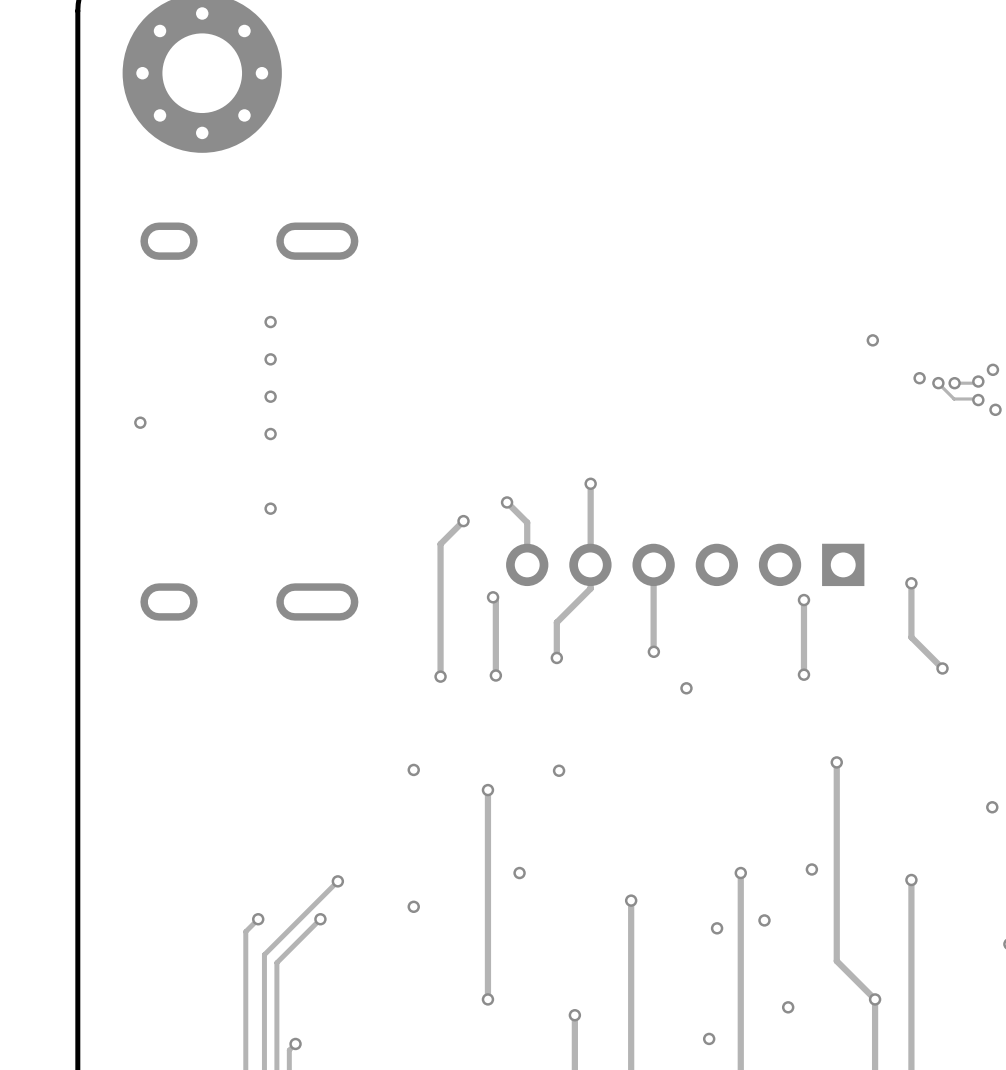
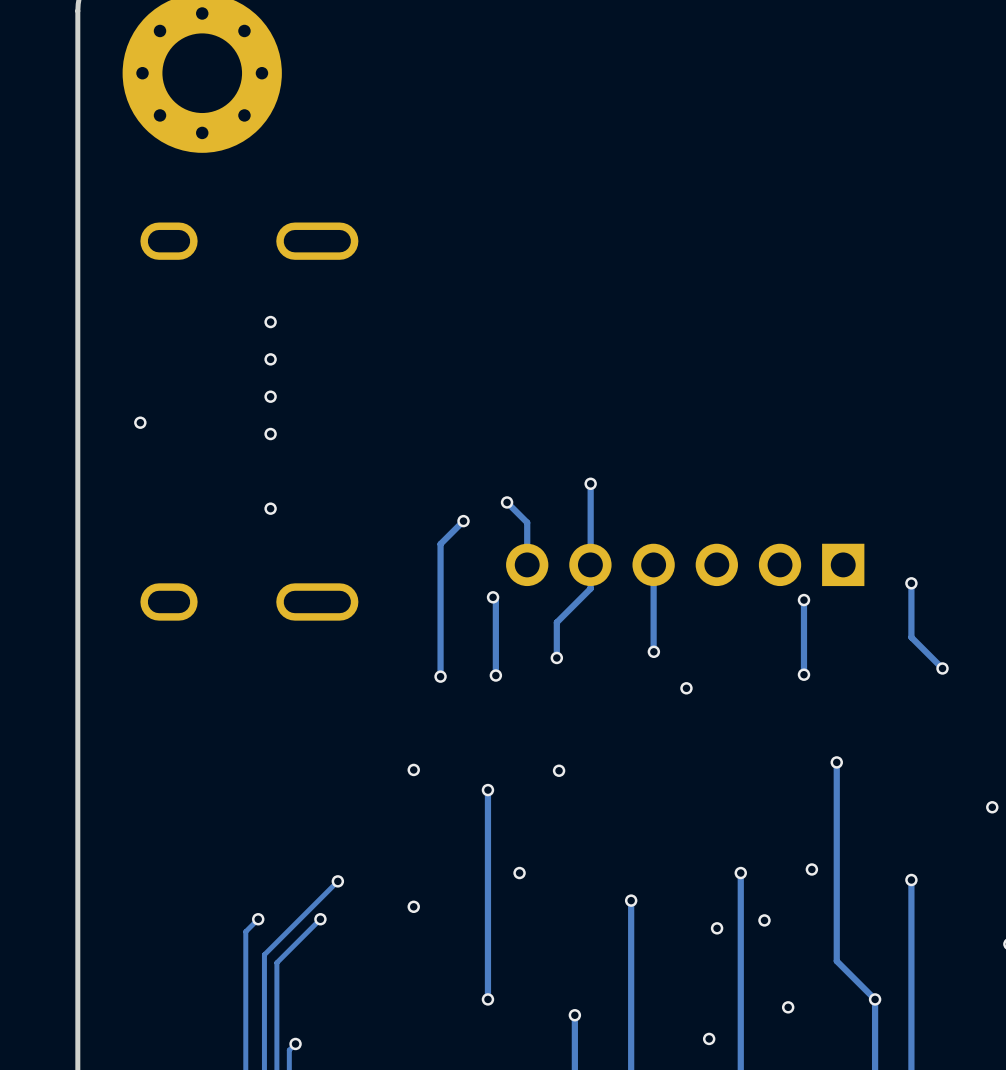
via: (872, 340) -> none
via: (992, 369) -> none
via: (919, 378) -> none
track: (978, 381) (976, 383) (954, 383) -> none
via: (978, 381) -> none
track: (938, 383) (954, 398) (978, 400) -> none
via: (938, 383) -> none
via: (954, 383) -> none
via: (978, 400) -> none
via: (995, 409) -> none

